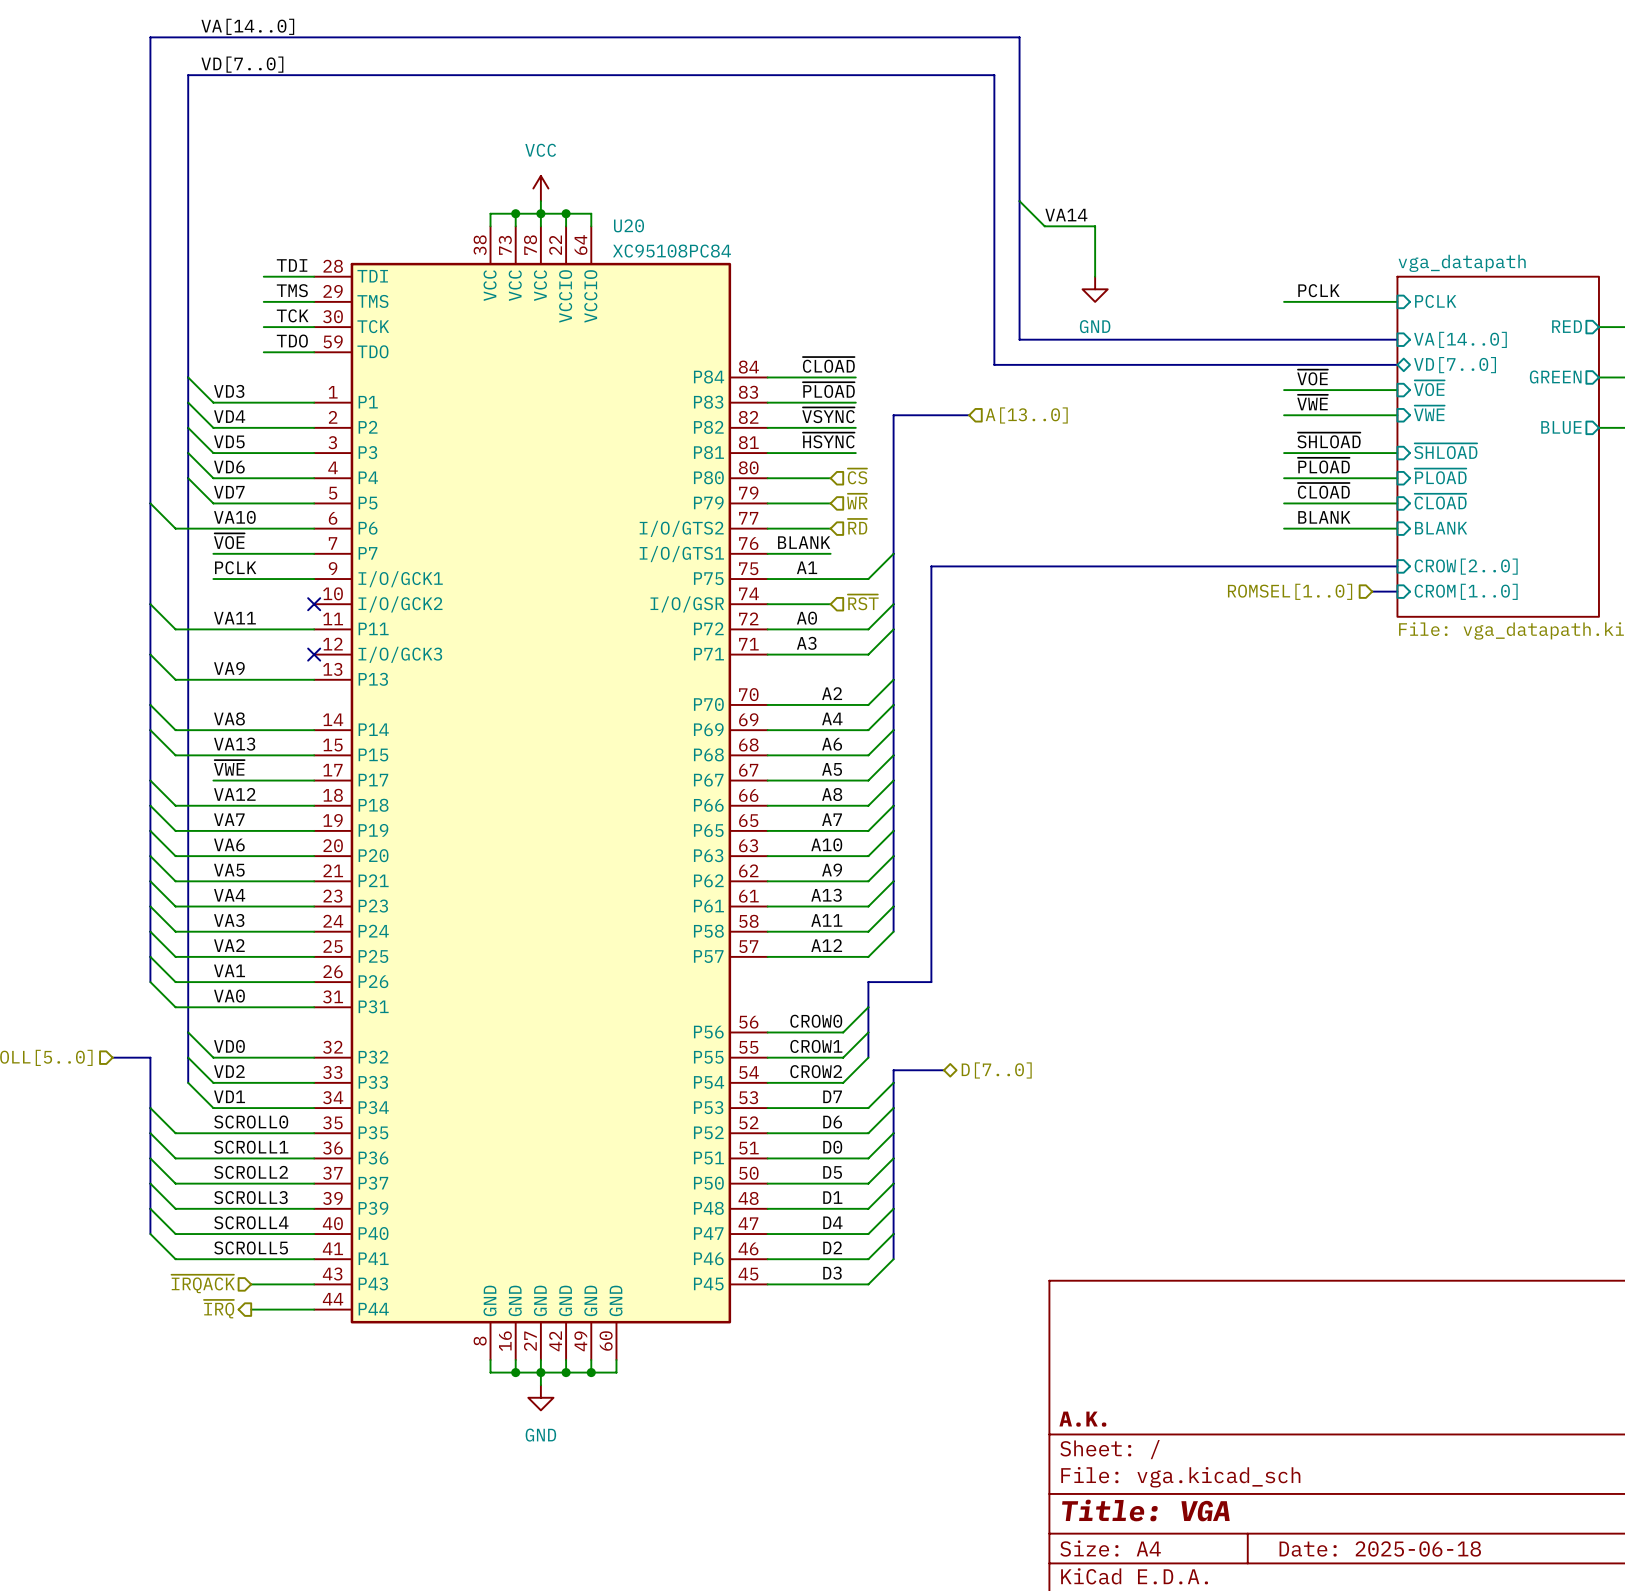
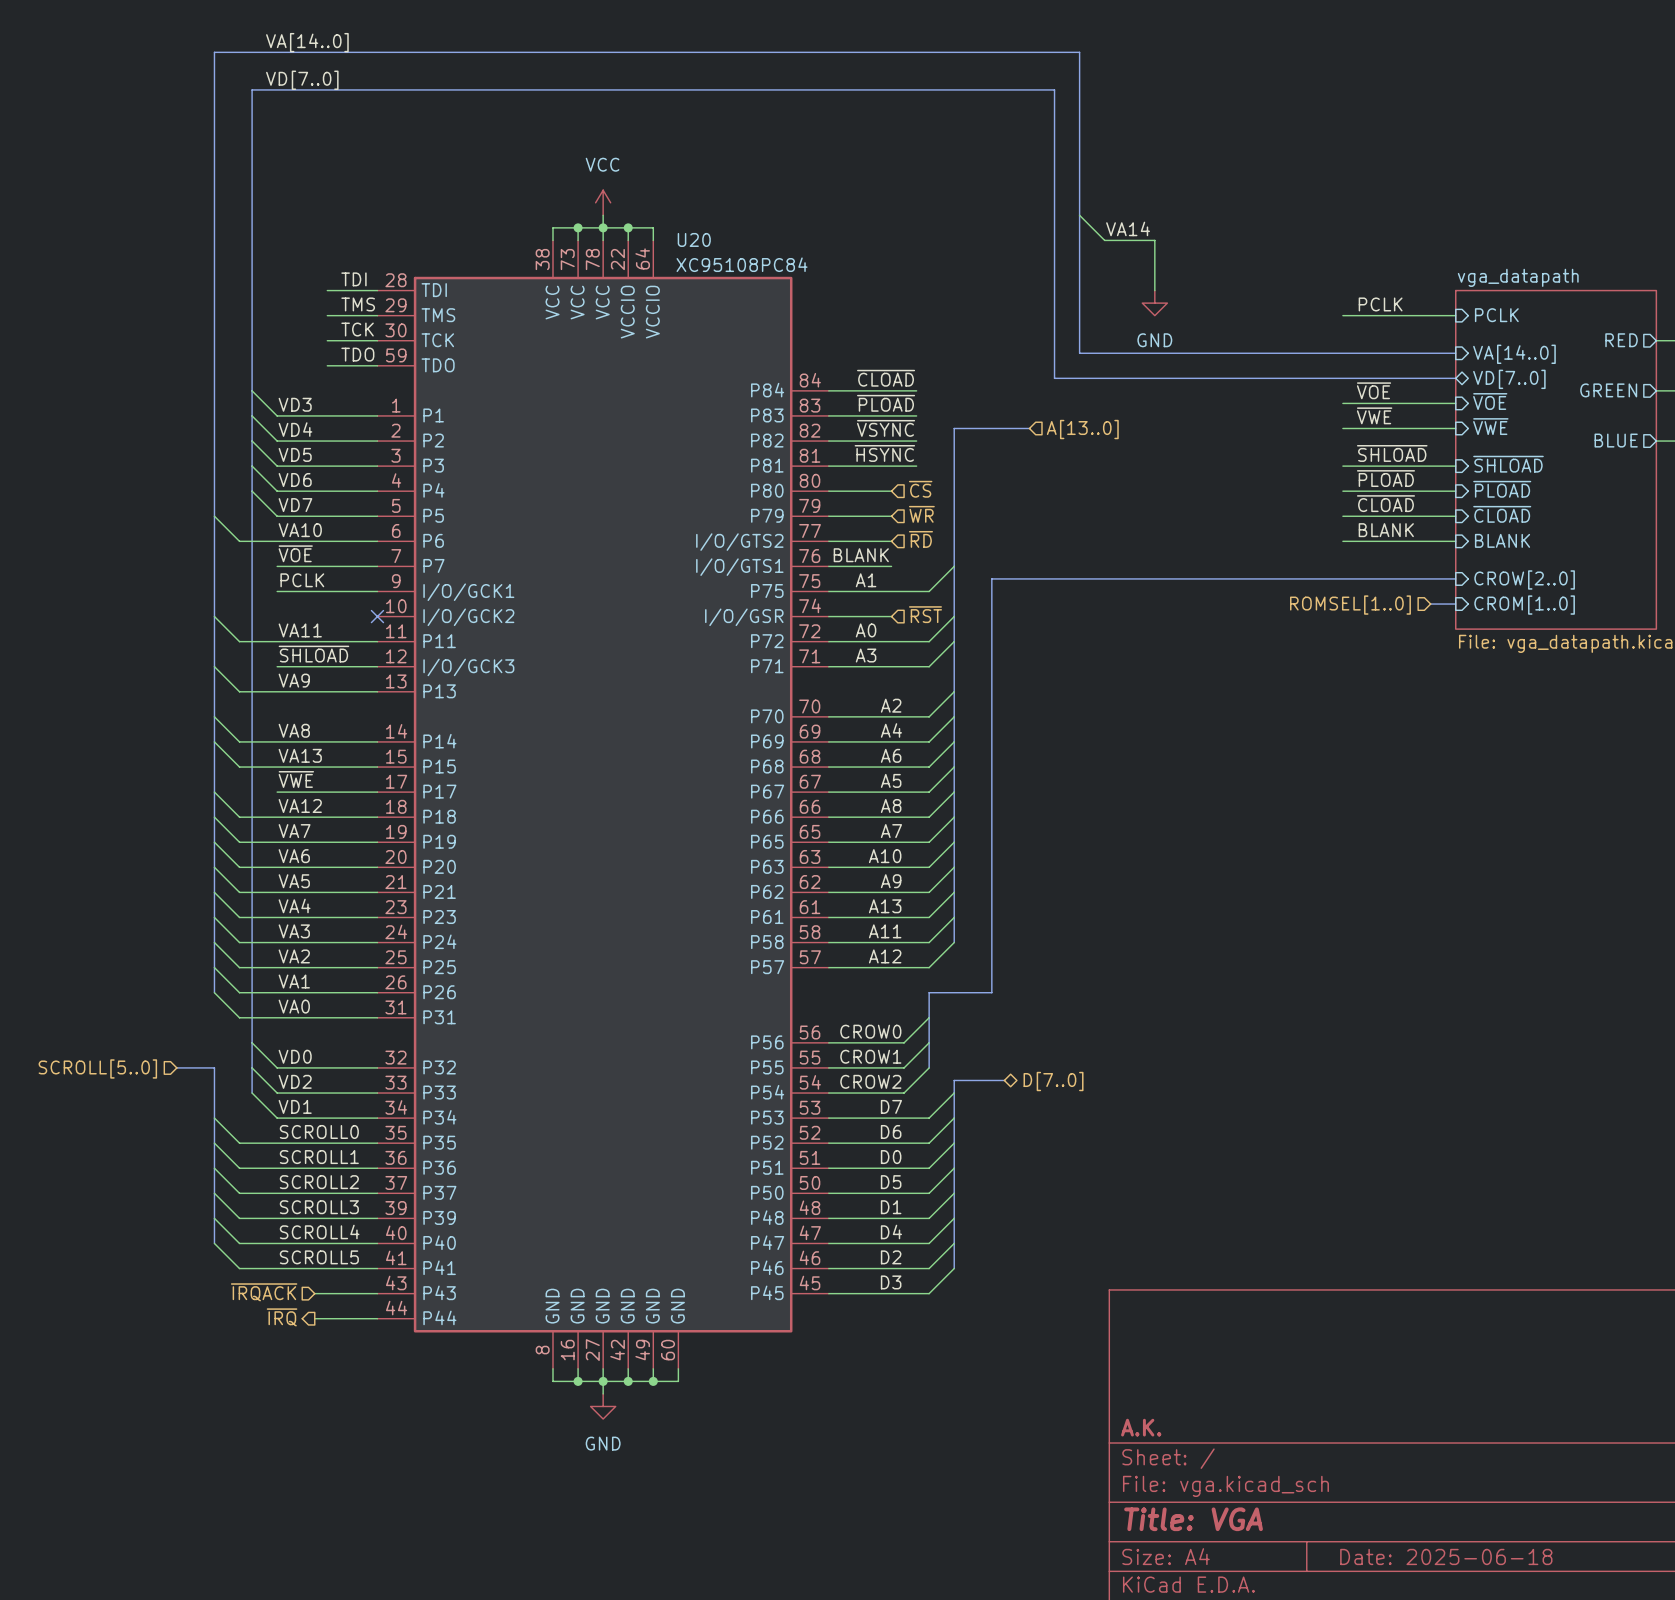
label: none -> ~{SHLOAD} (313, 654)
wire: none -> (277, 666) (377, 666)
no-connect mark: (314, 654) -> none

